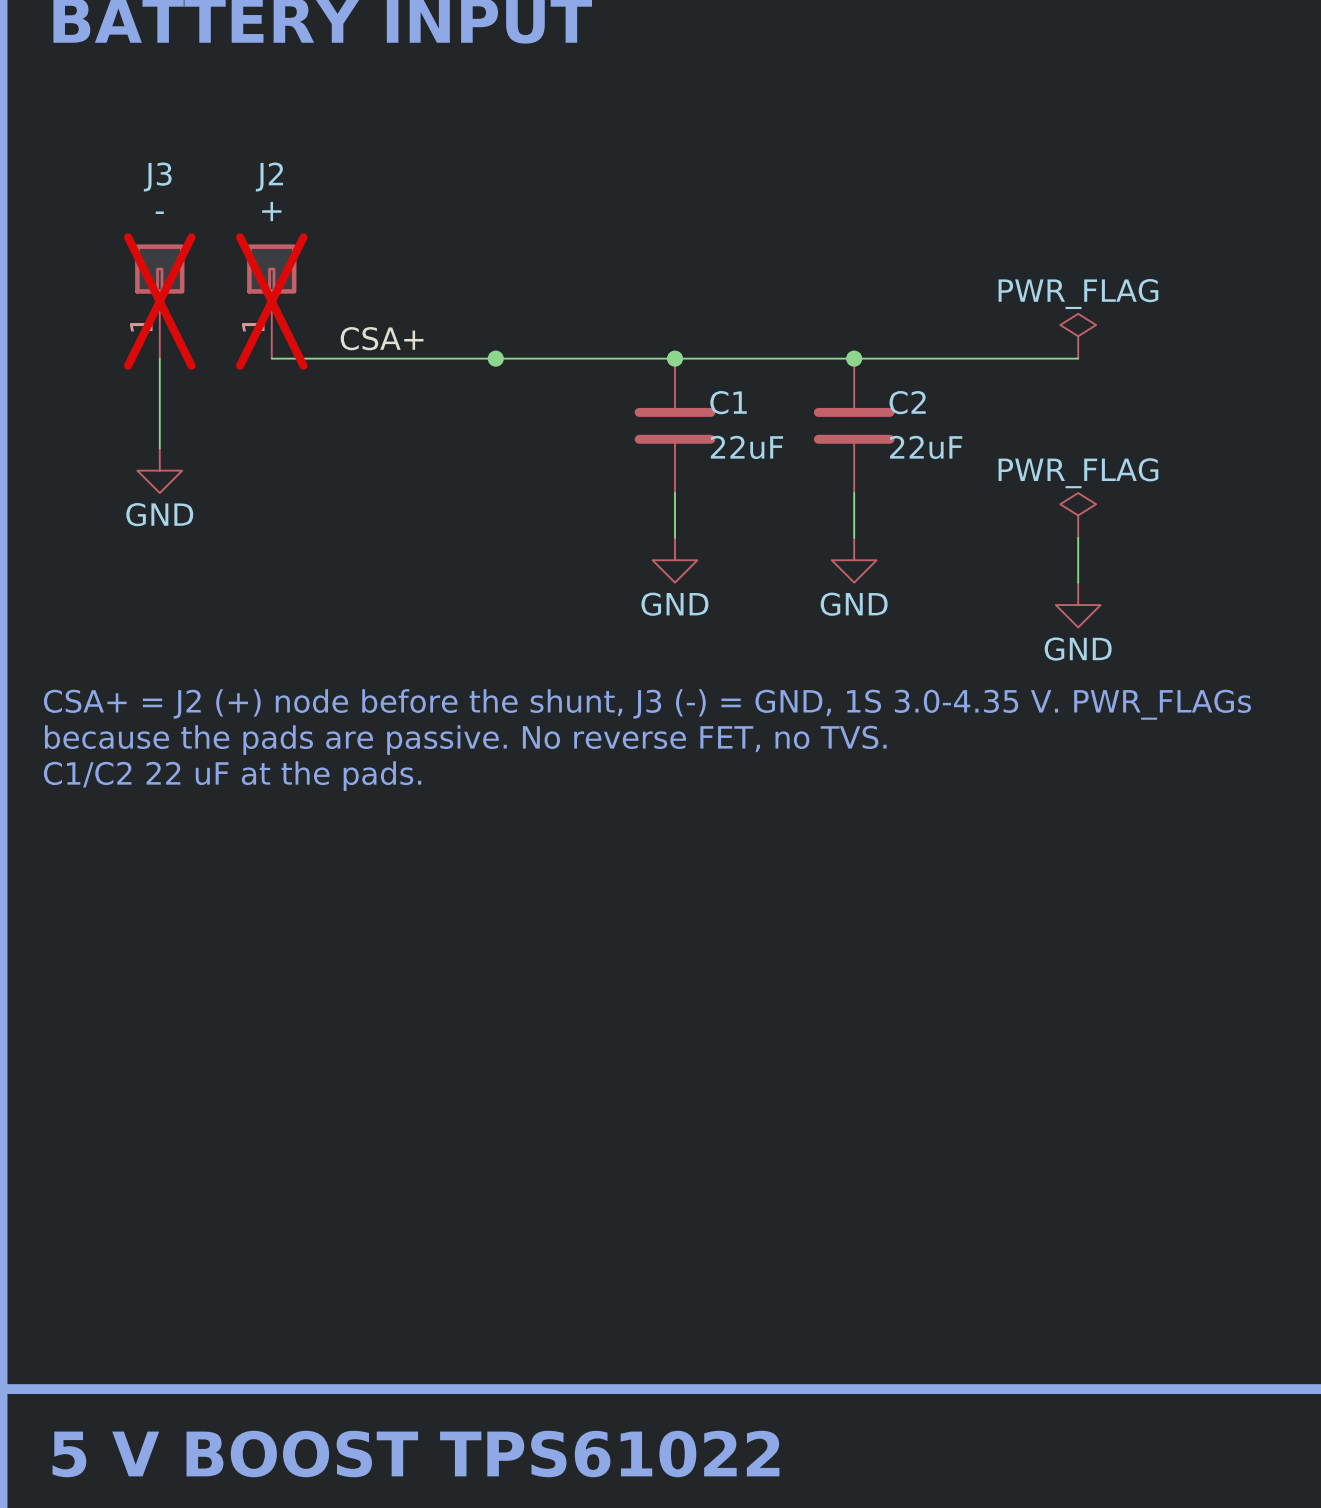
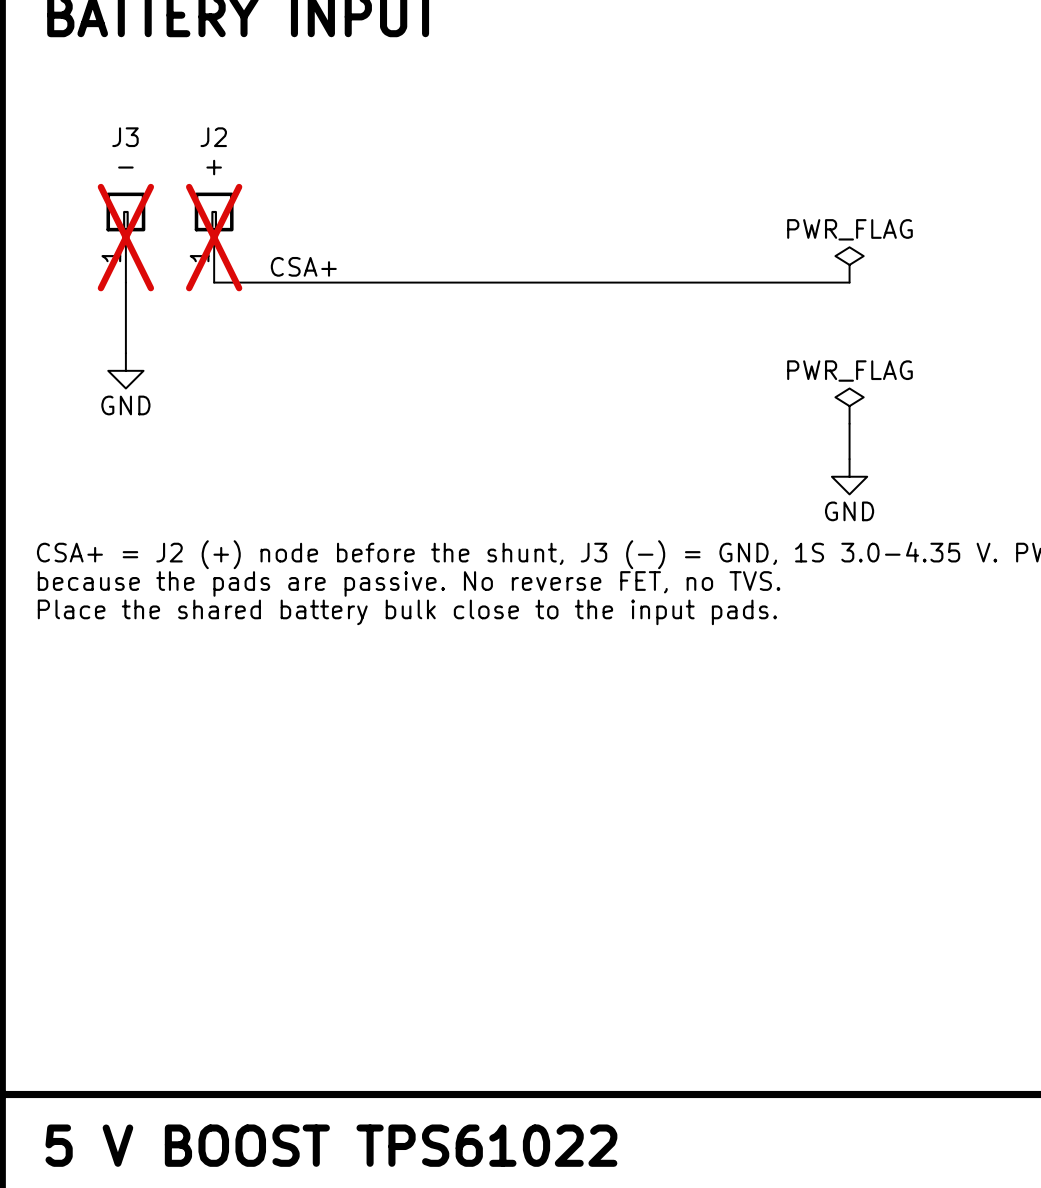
junction: (495, 358) -> none
junction: (674, 358) -> none
junction: (854, 358) -> none
C1: 22uF (674, 425) -> none
C2: 22uF (854, 425) -> none
wire: (674, 493) (674, 537) -> none
wire: (854, 493) (854, 537) -> none
power symbol: GND (674, 560) -> none
power symbol: GND (854, 560) -> none
text: C1/C2 22 uF at the pads. (232, 776) -> Place the shared battery bulk close to the input pads. (407, 612)

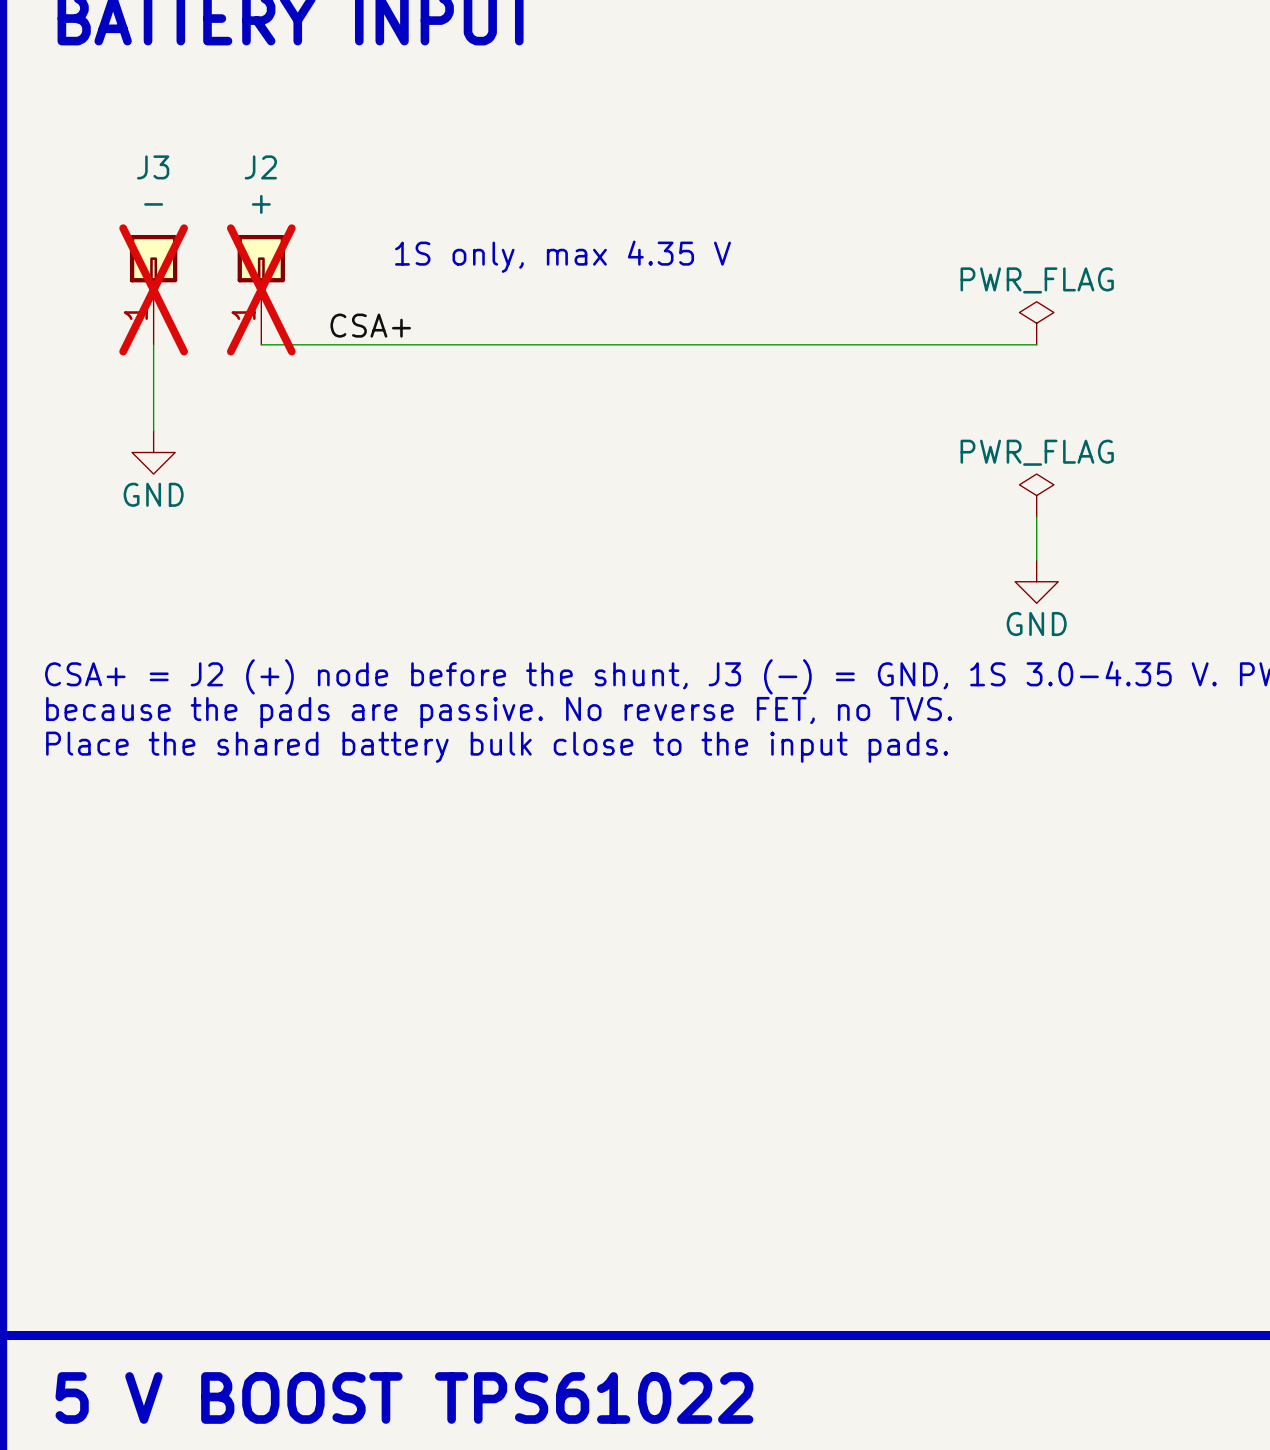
text: none -> 1S only, max 4.35 V (563, 256)

